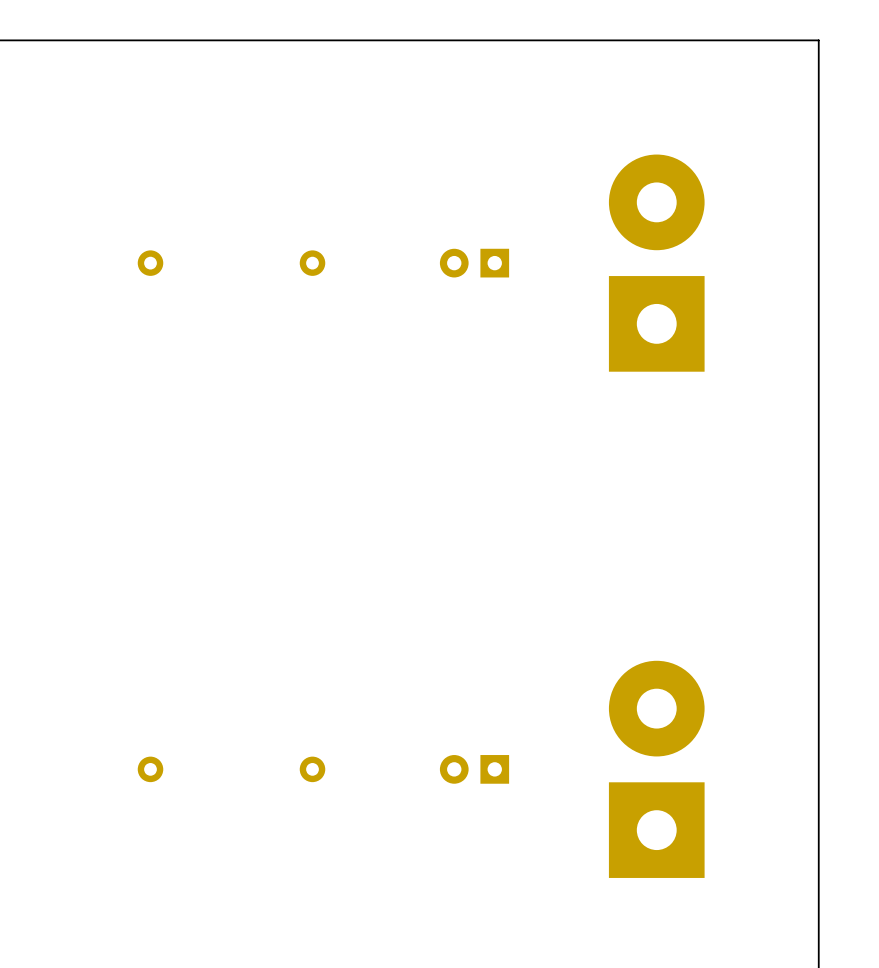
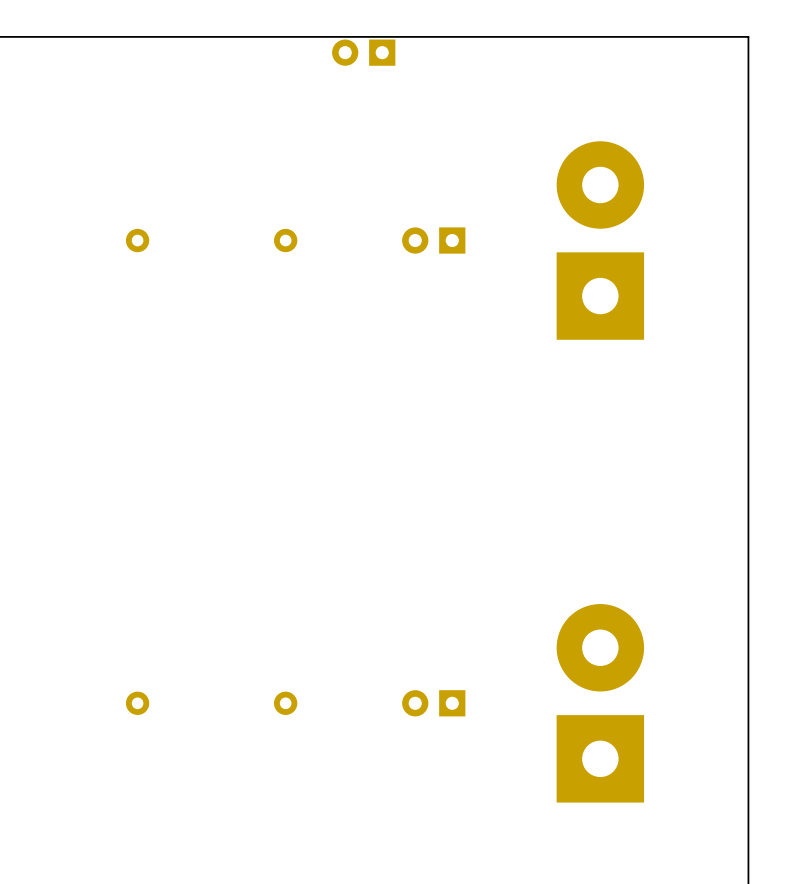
part: none -> (363, 52)

